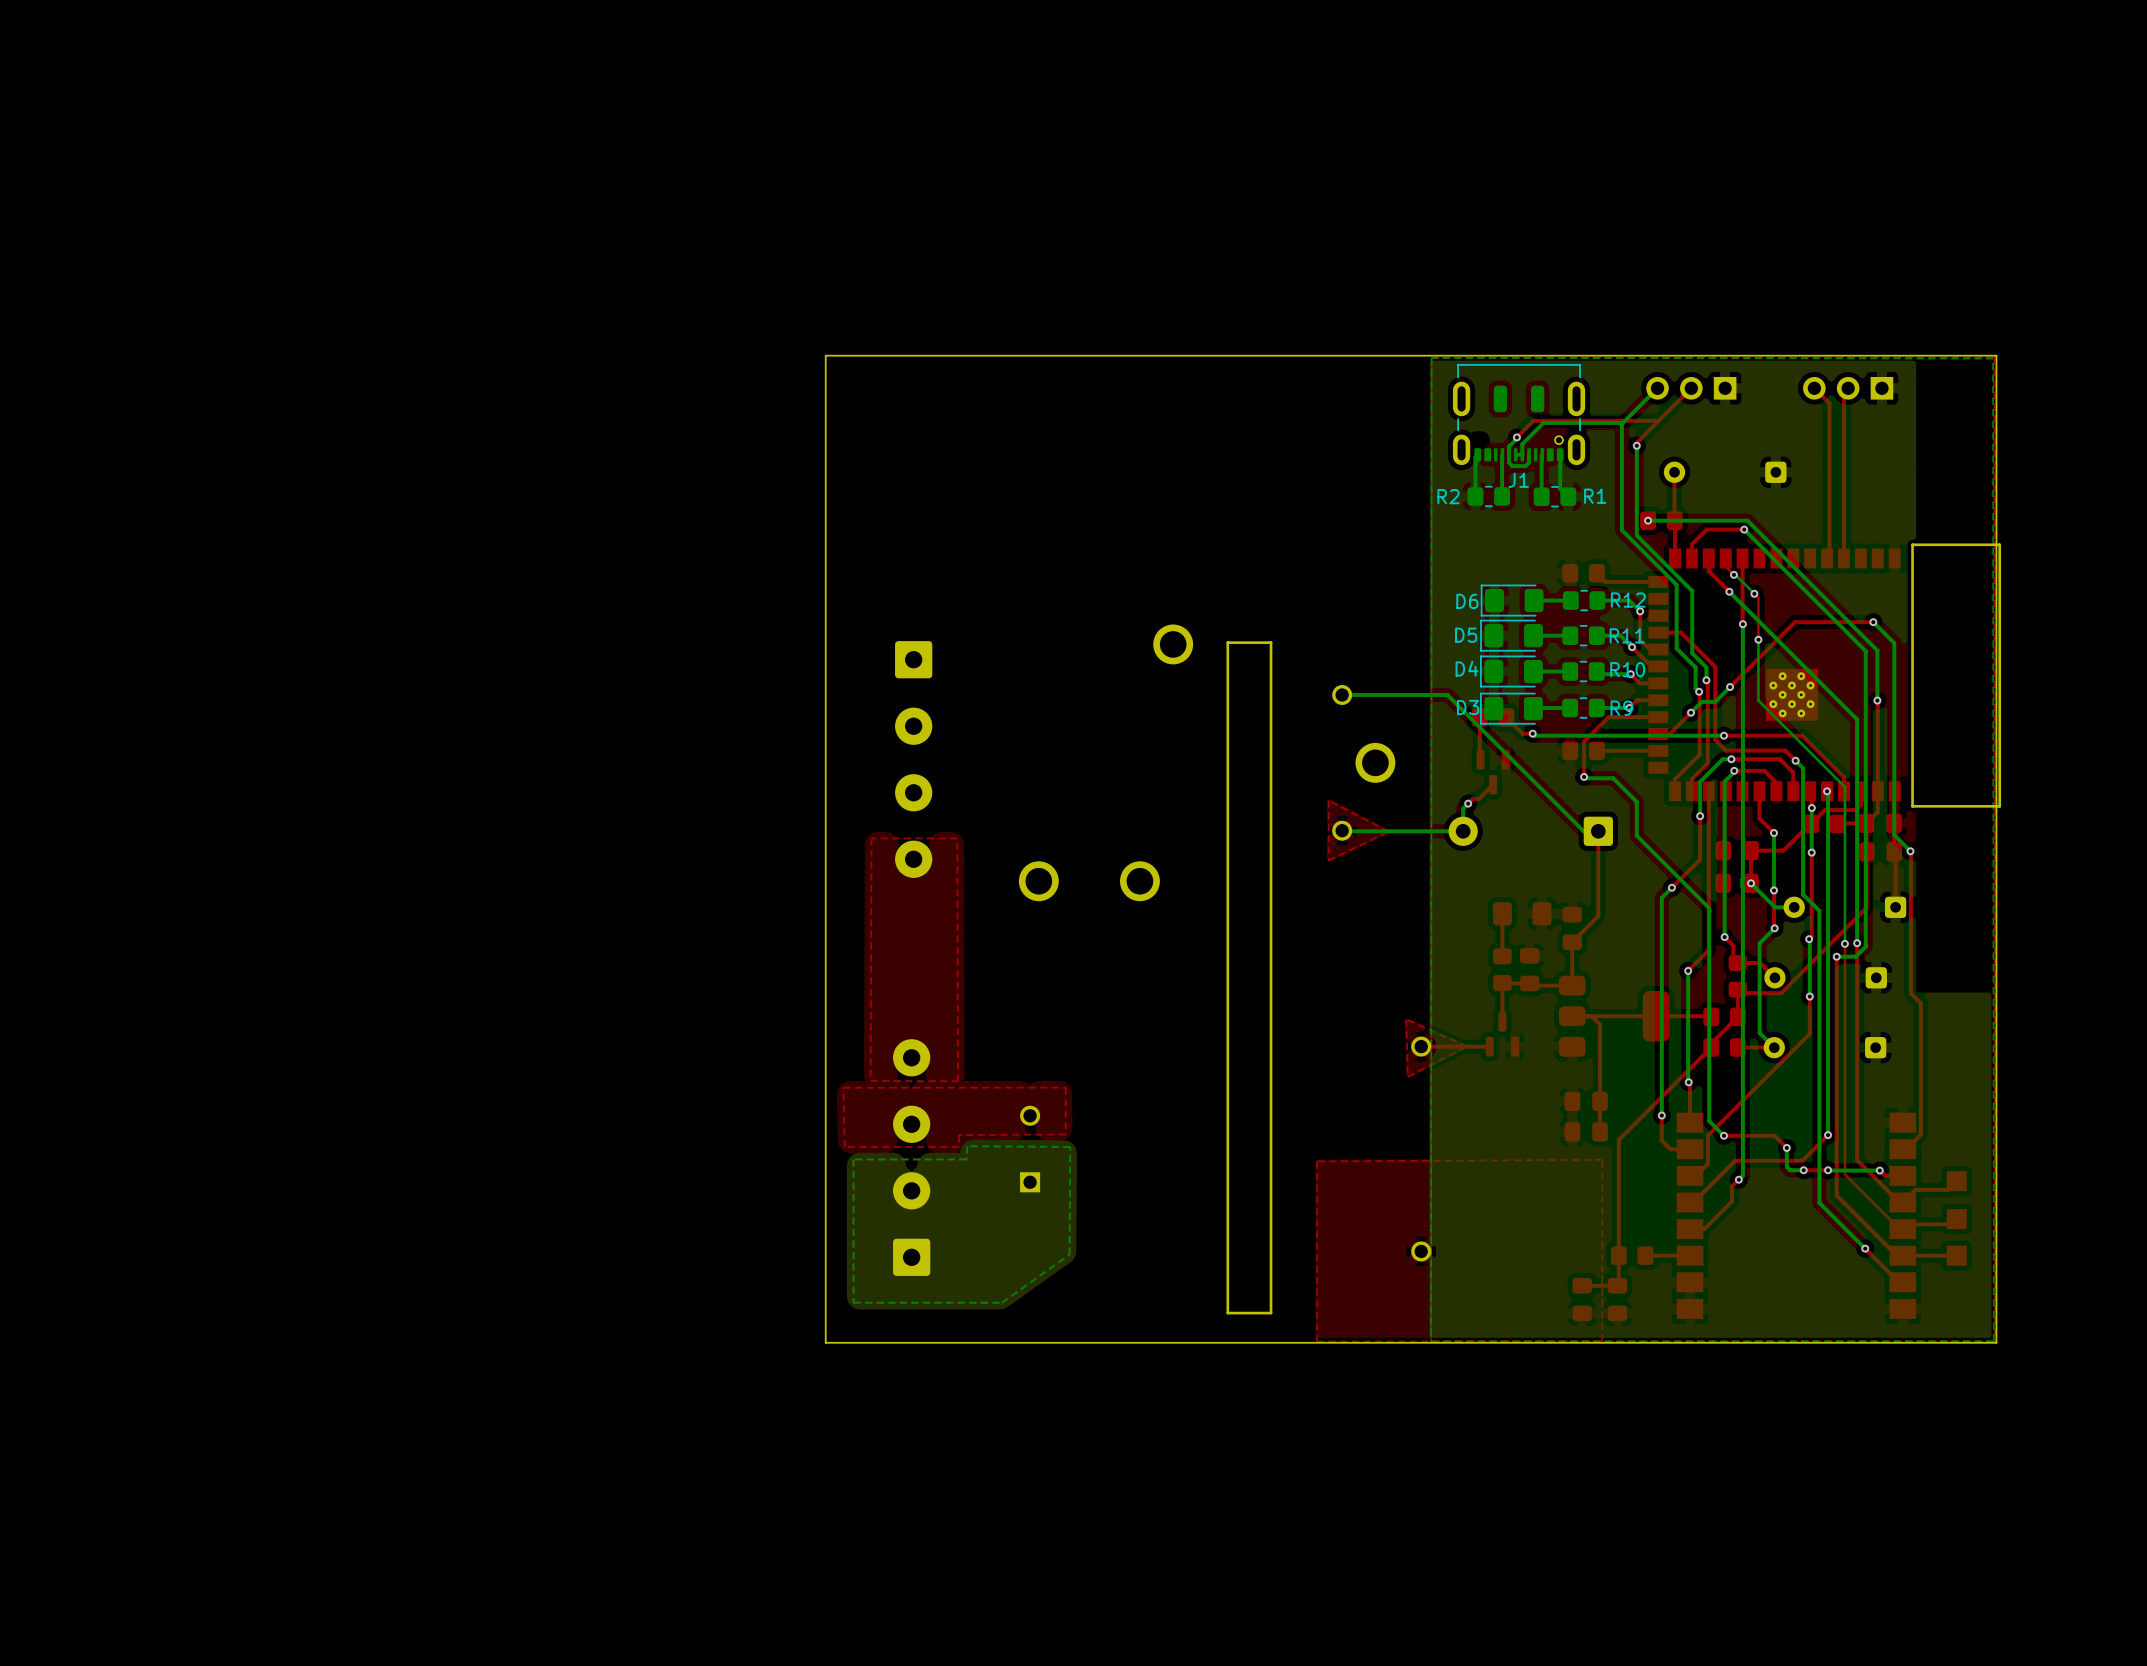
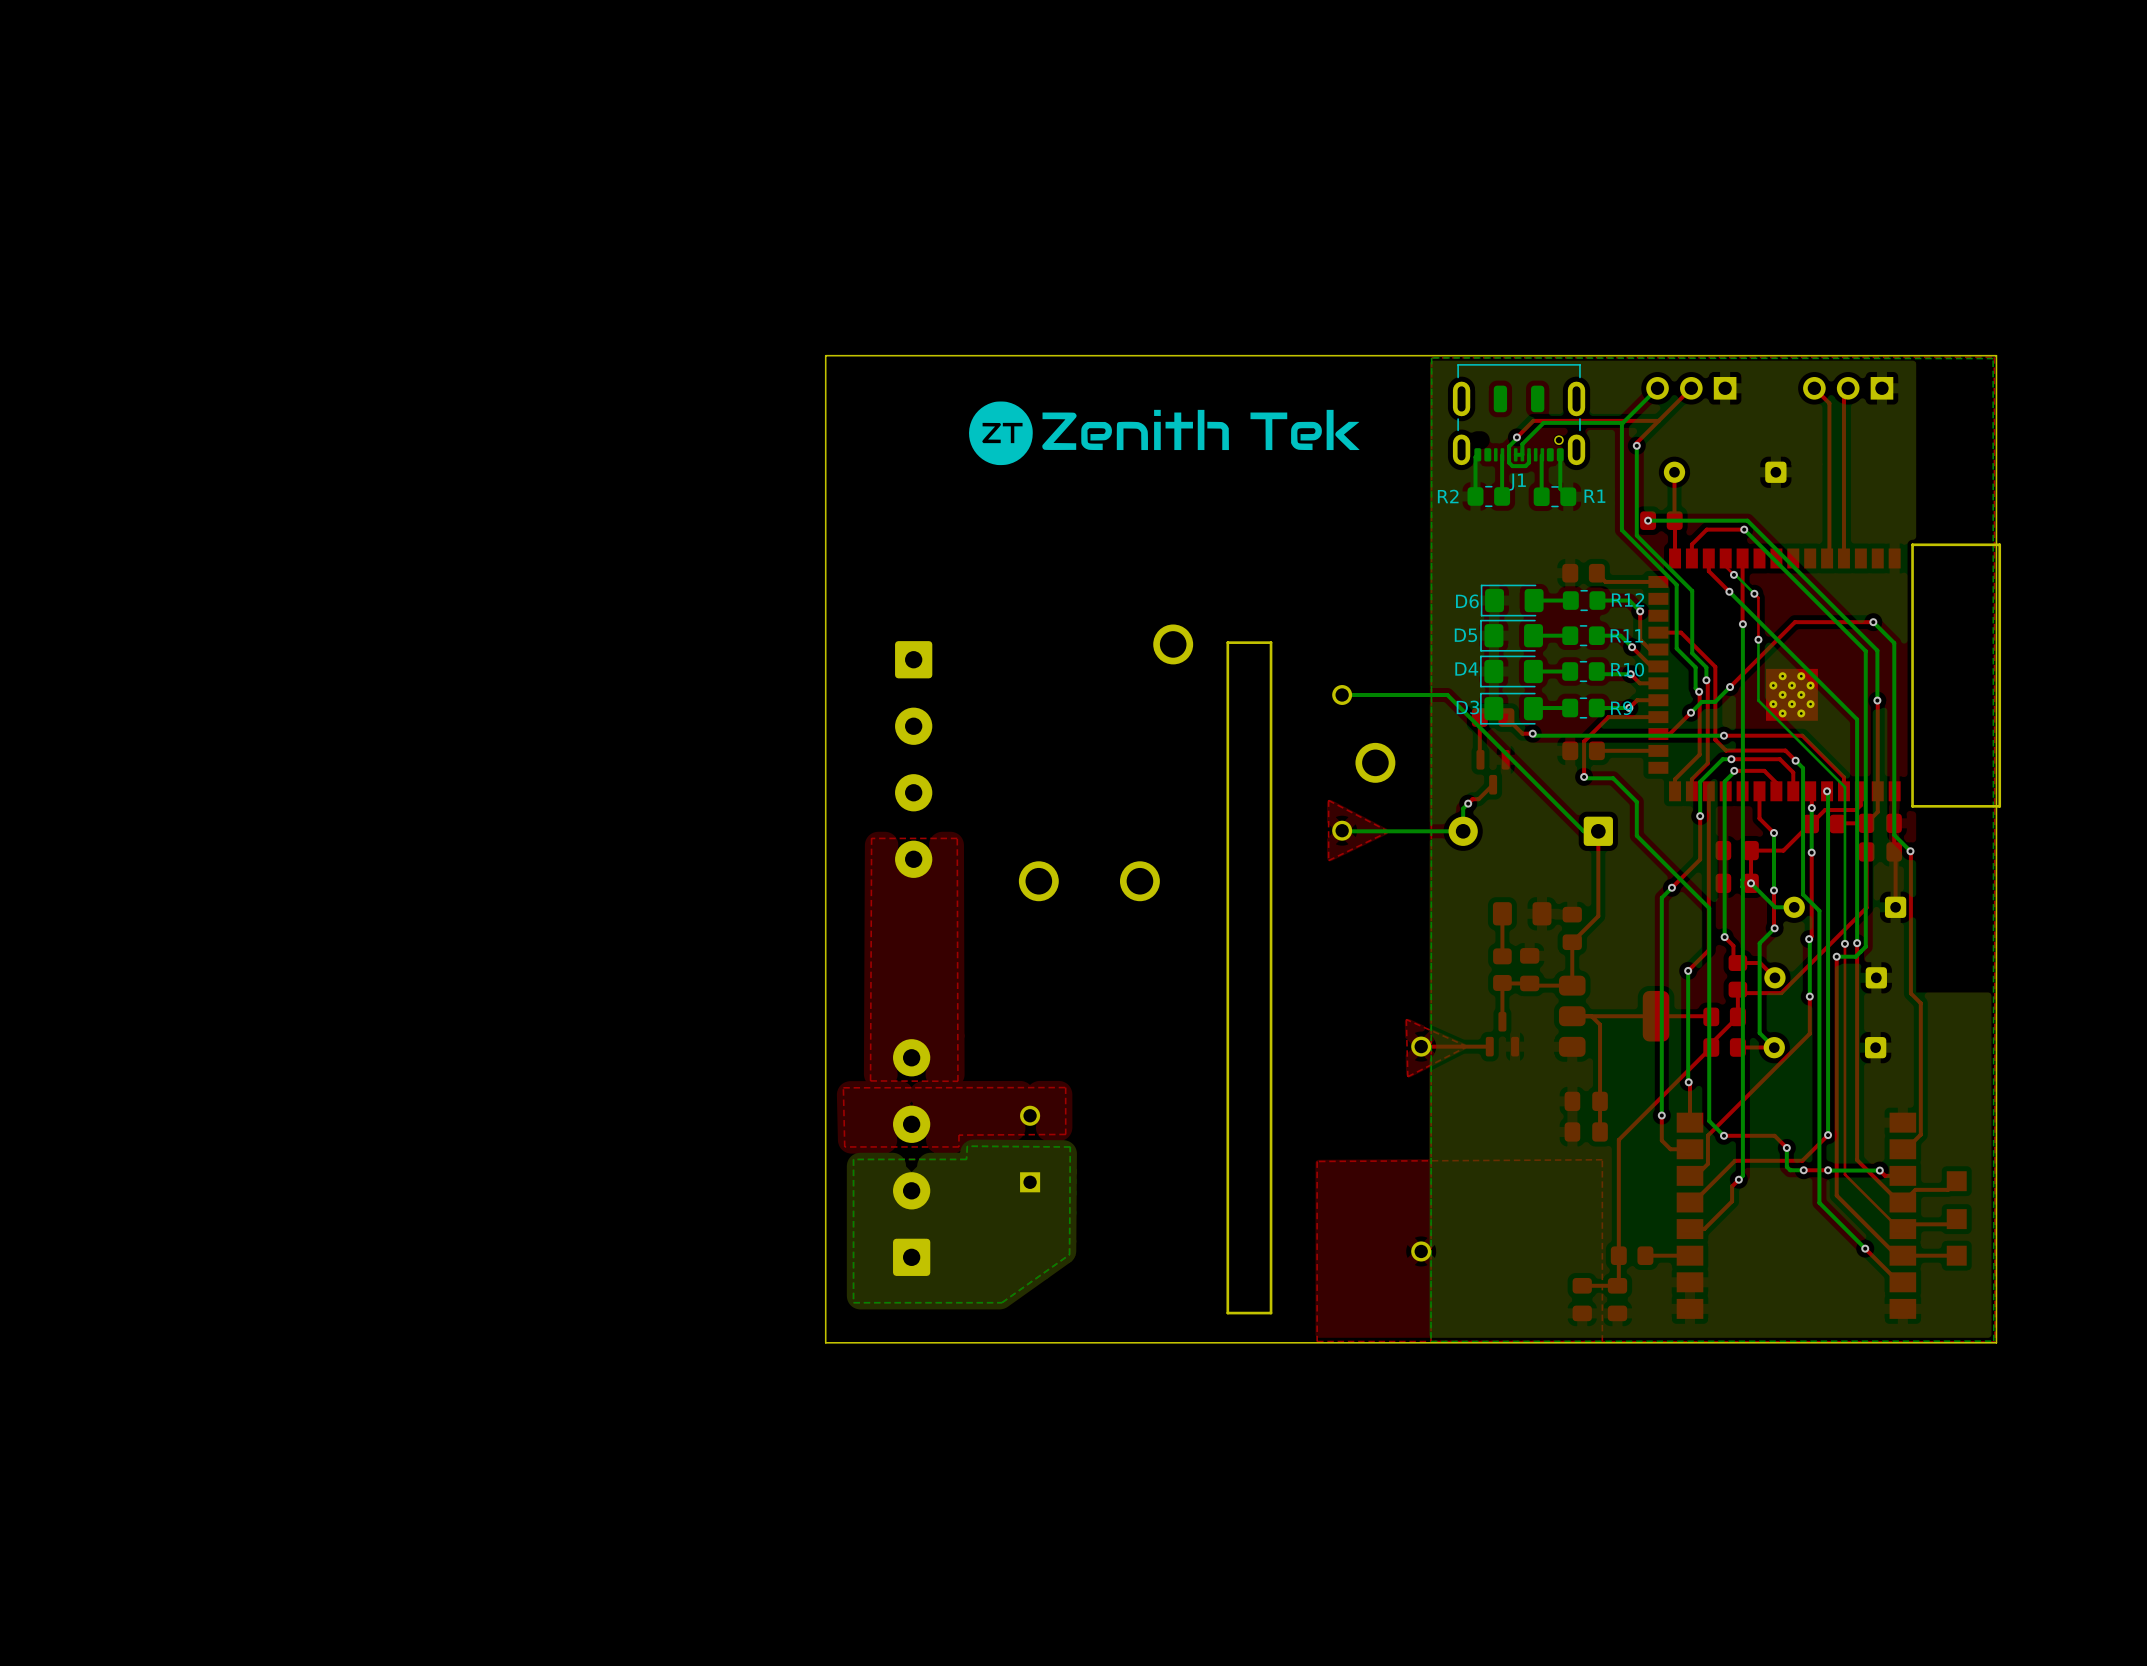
drawing: none -> [969, 401, 1360, 466]

